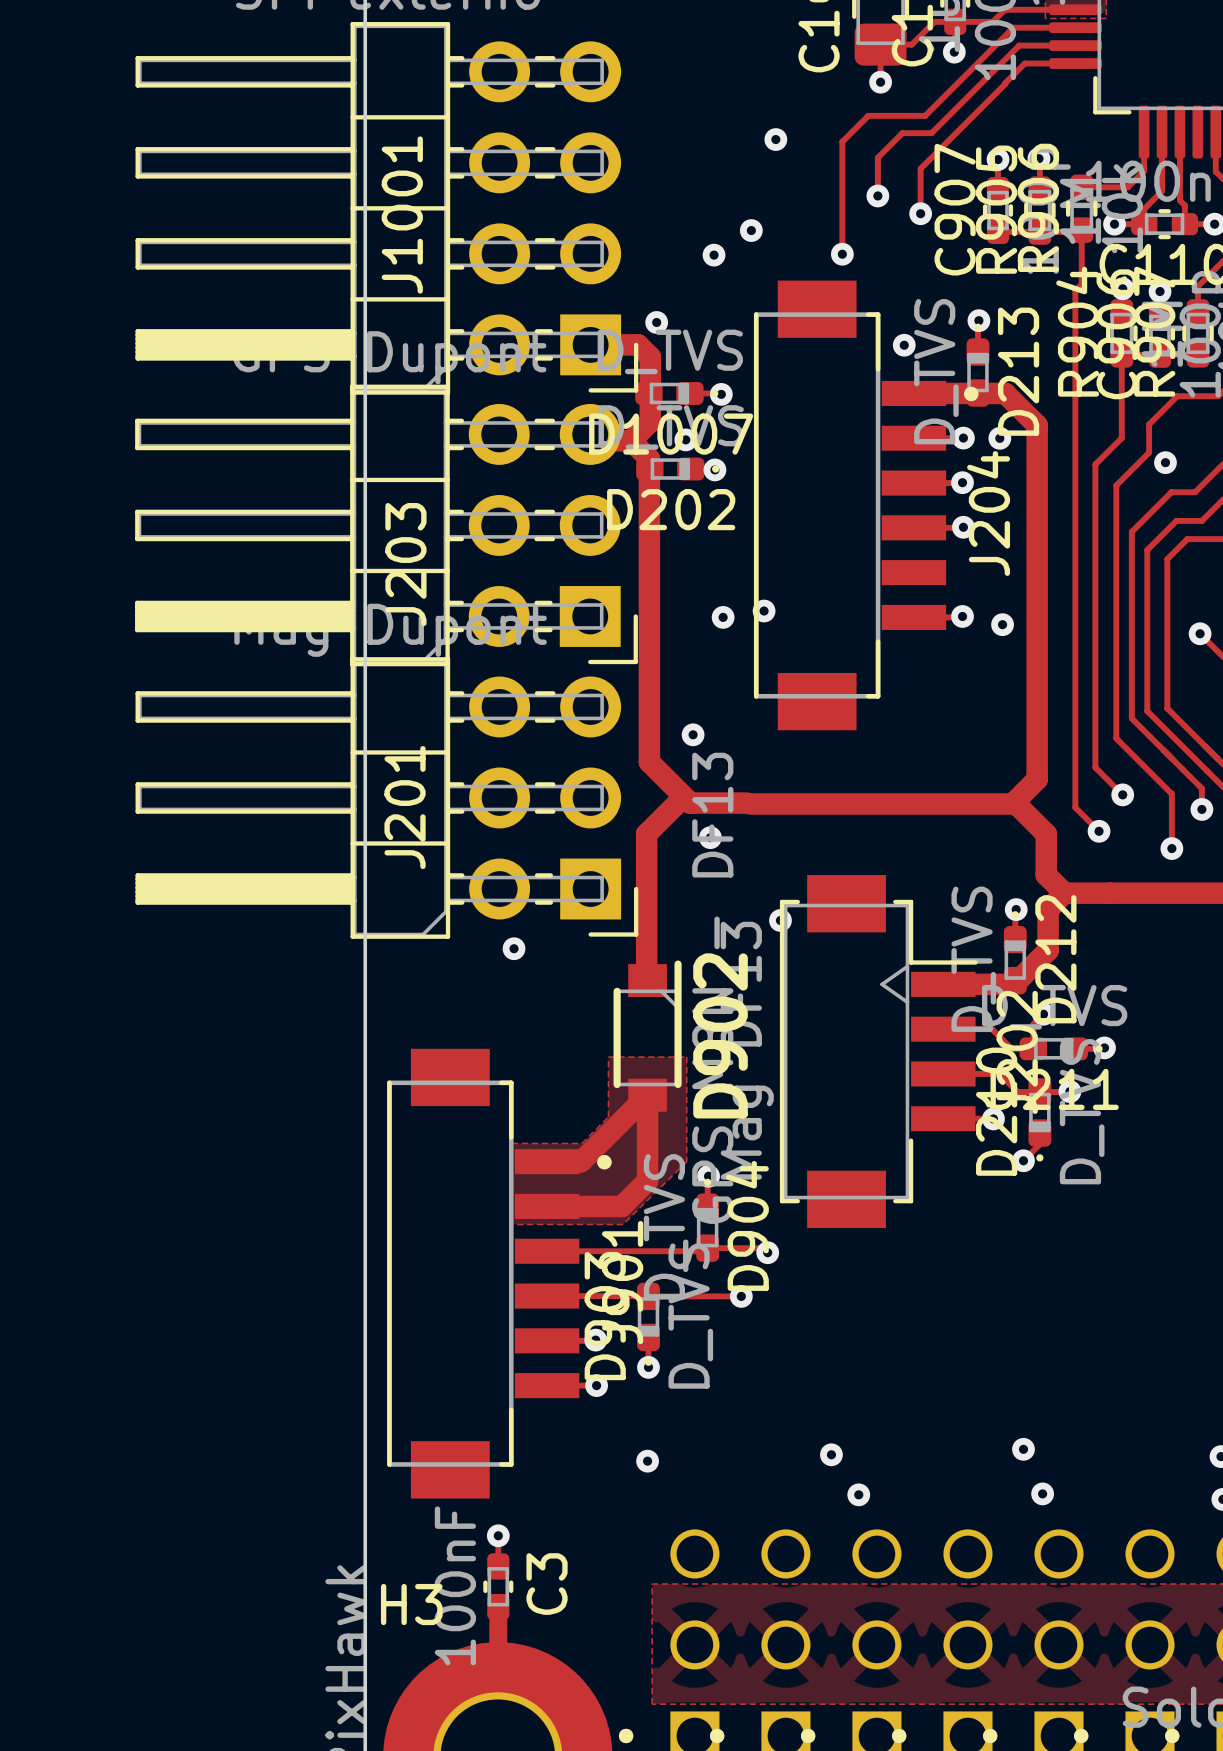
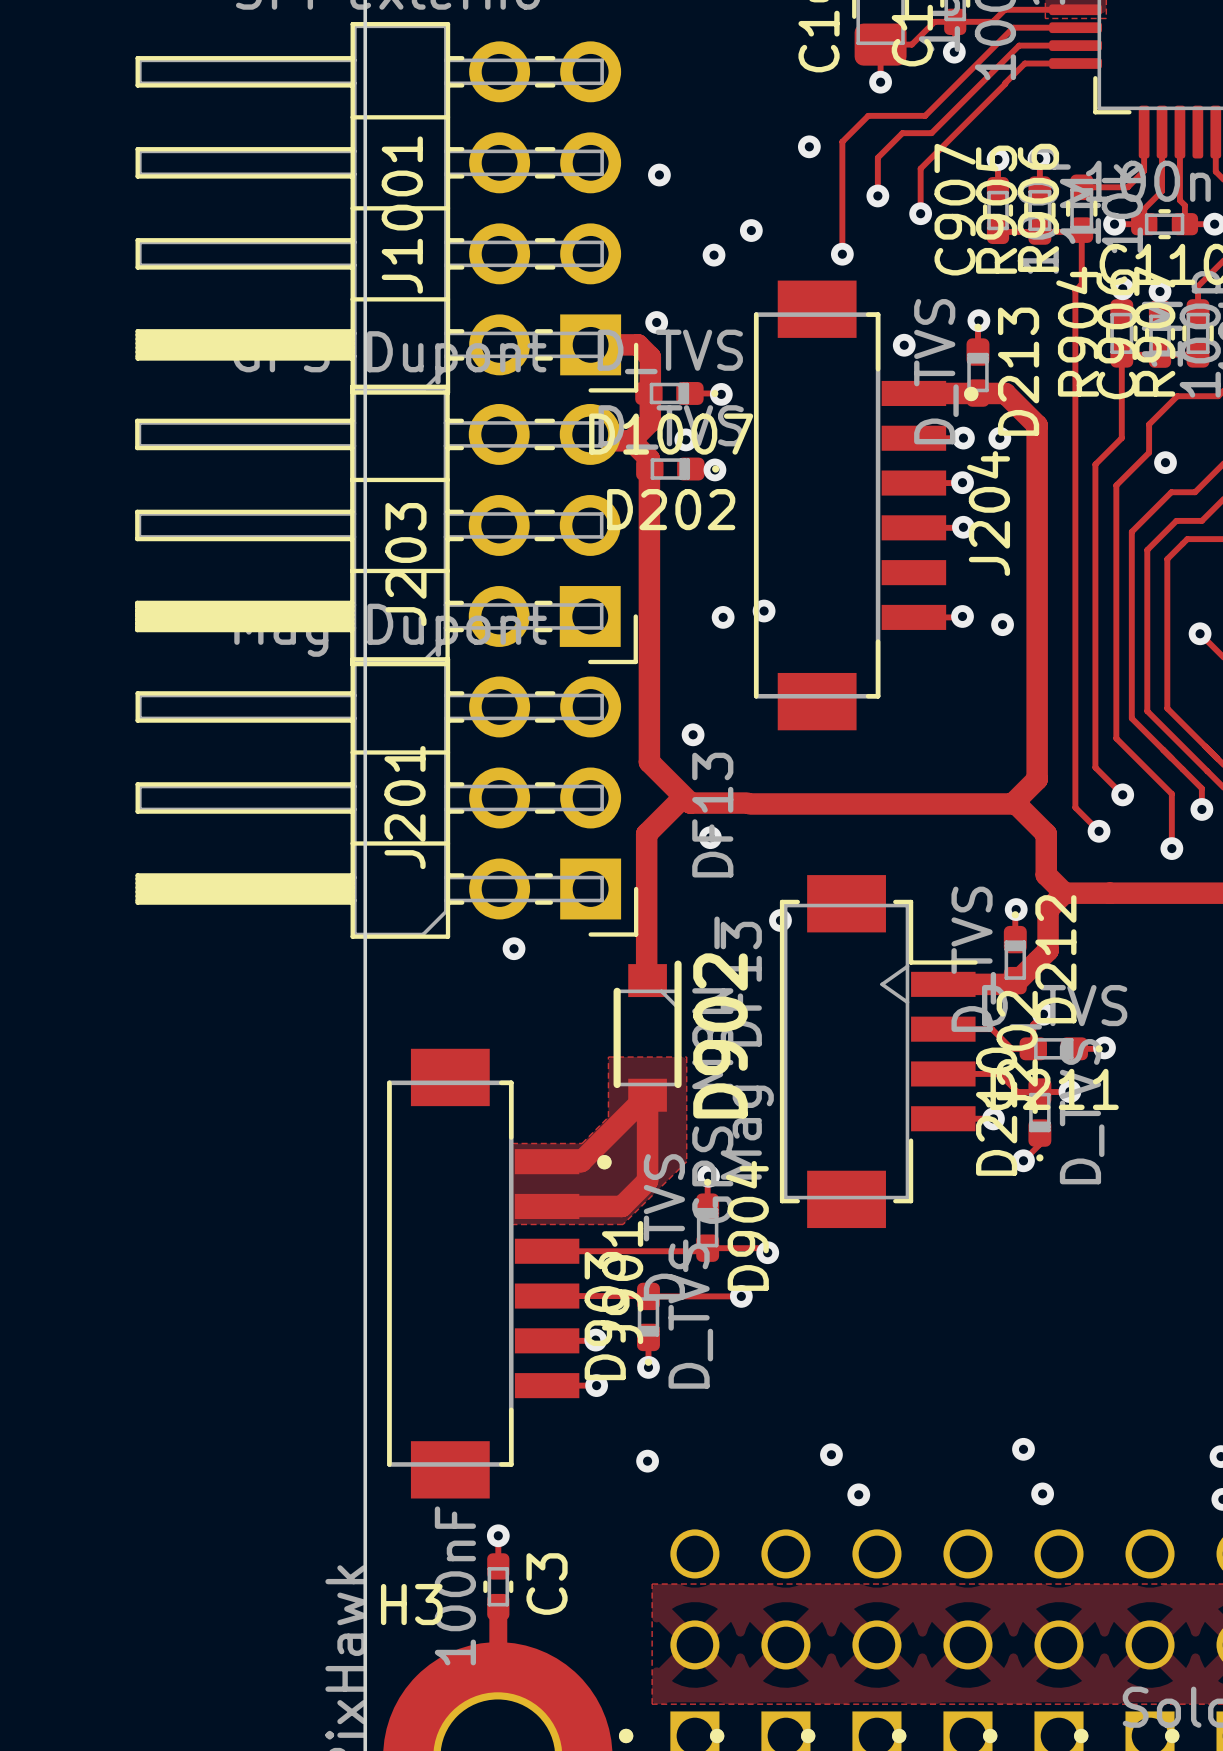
via position: (775, 139) -> (809, 146)
via: none -> (659, 175)

